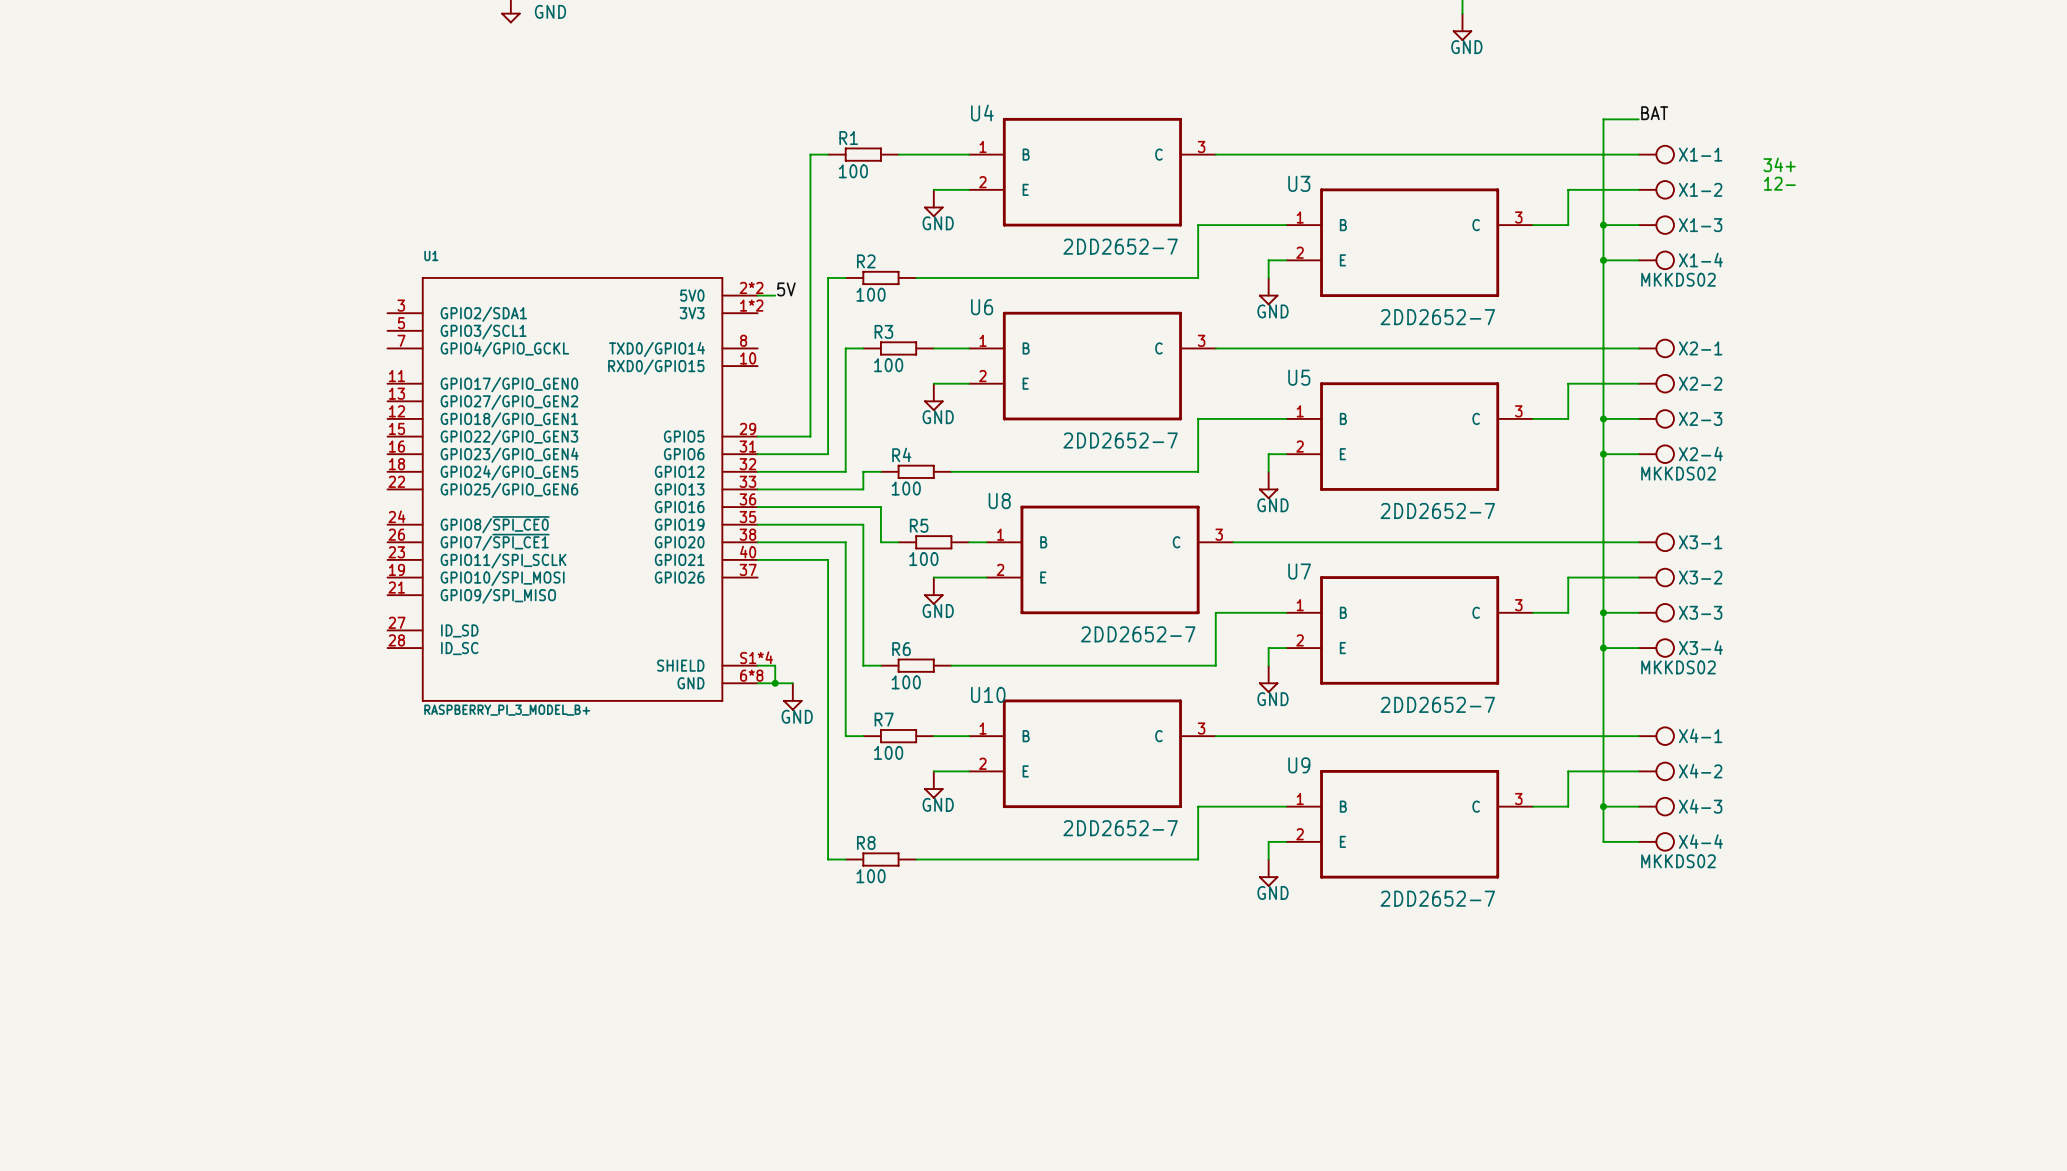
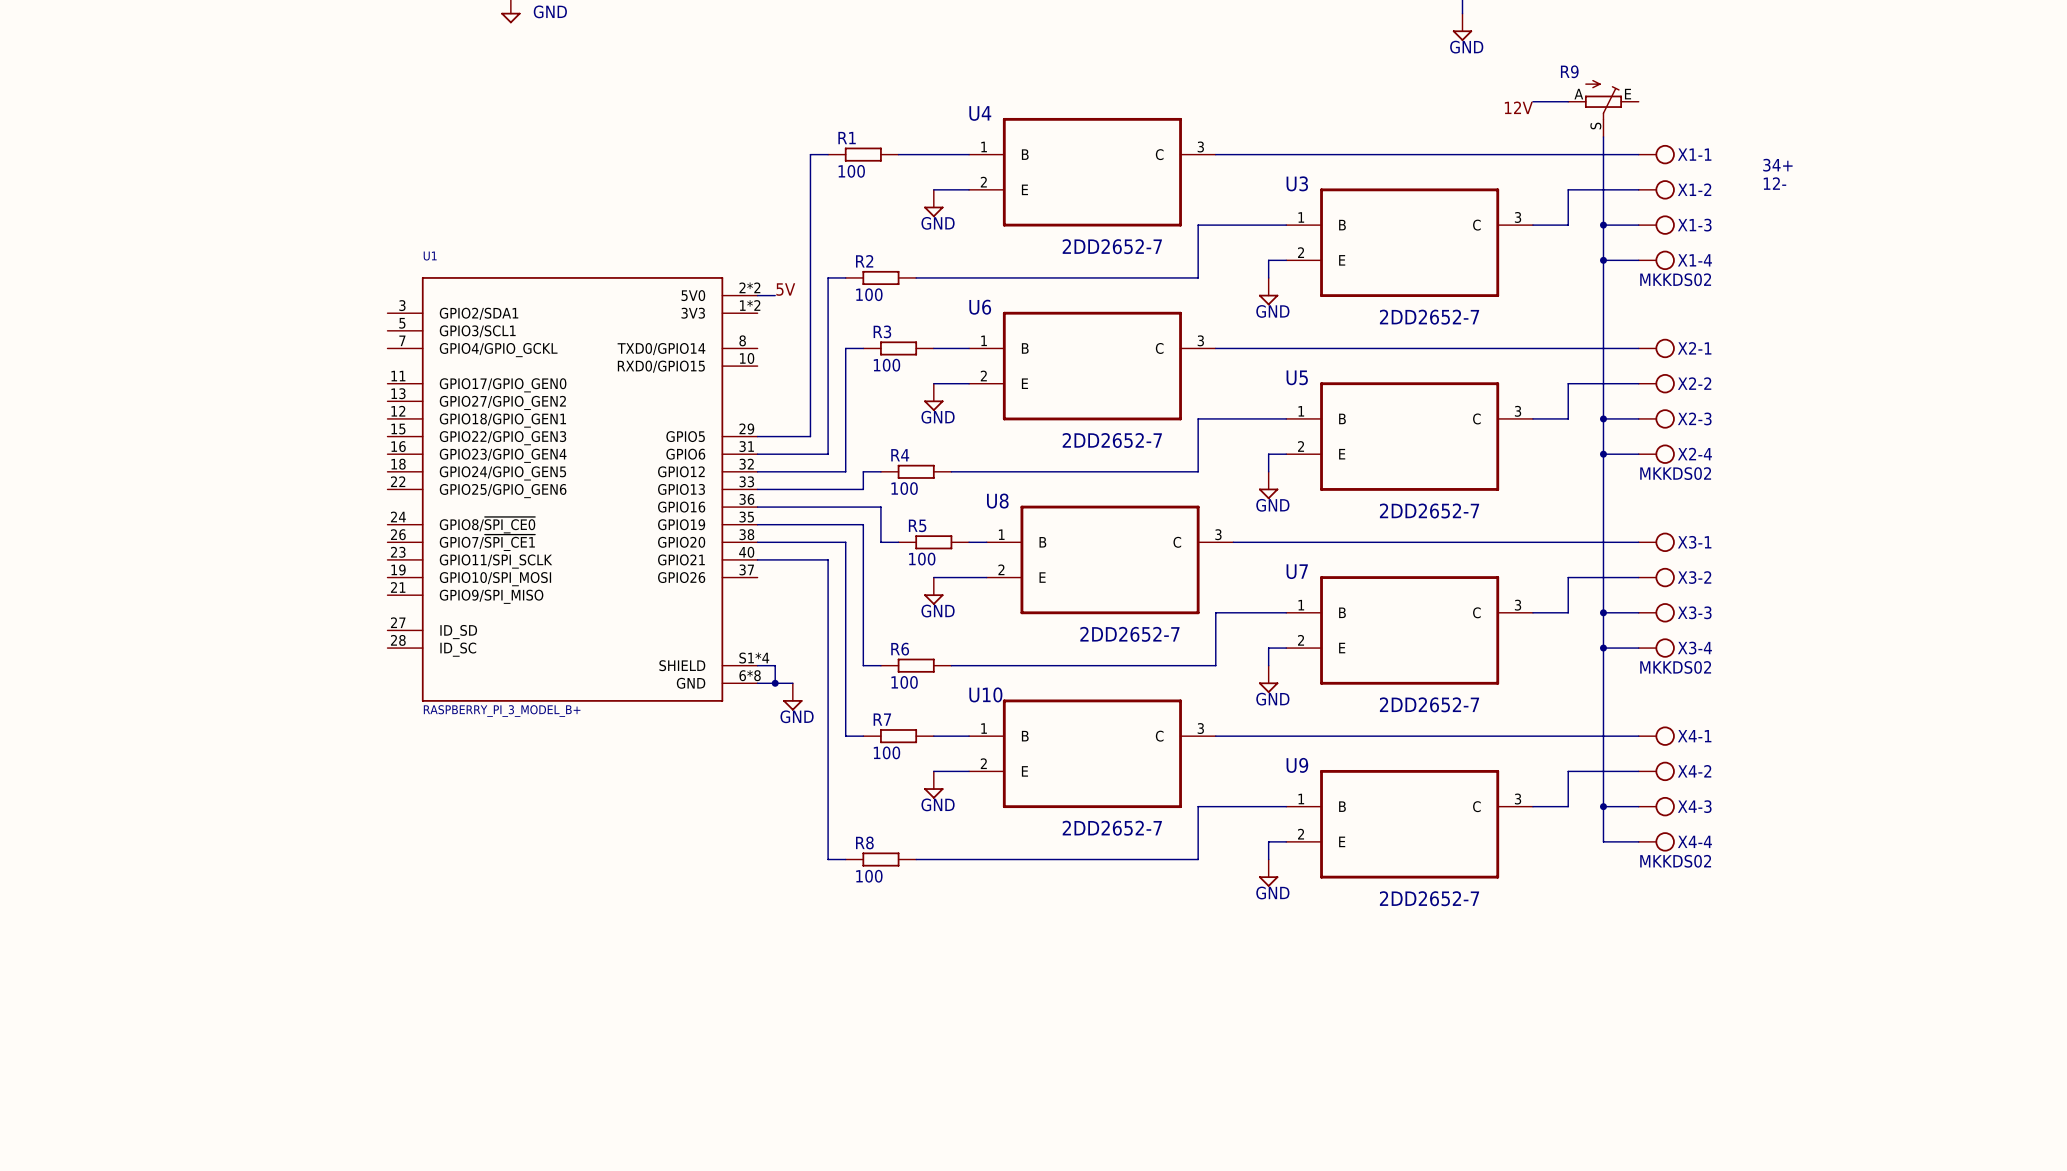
wire: none -> (1532, 101) (1568, 101)
label: none -> 12V (1518, 107)
R9: none -> (1603, 108)
label: BAT (1654, 113) -> none
wire: (1638, 119) (1603, 119) (1603, 136) -> none

